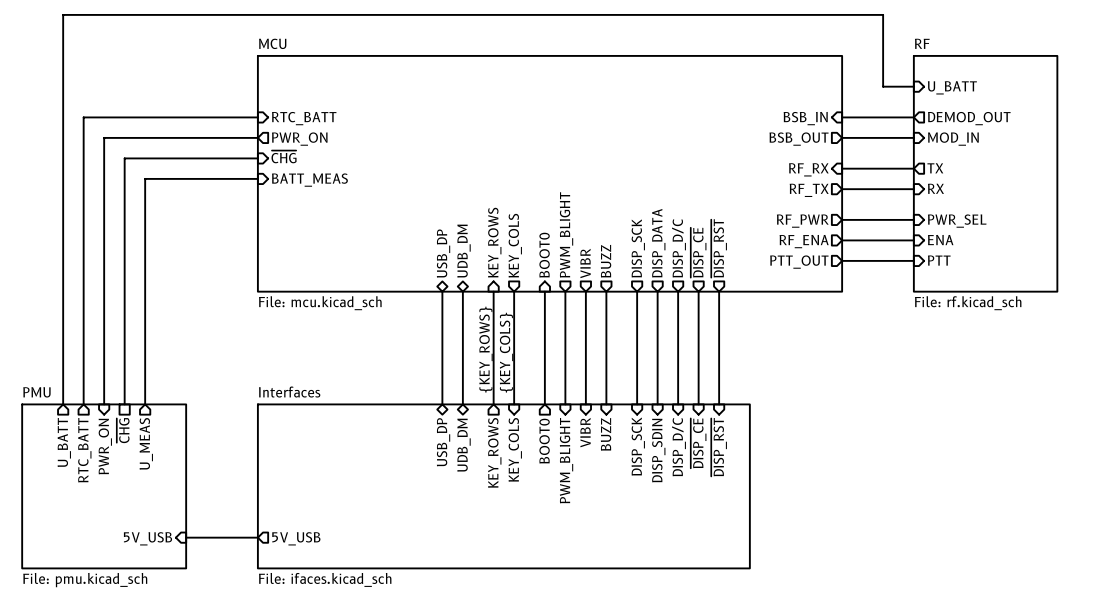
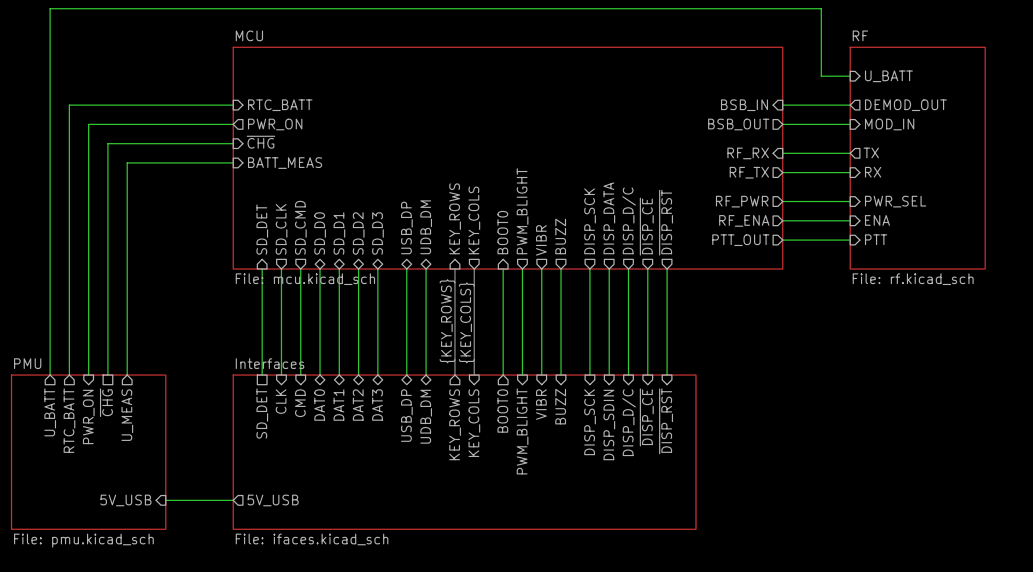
sheet pin: none -> SD_CMD (300, 227)
sheet pin: none -> SD_DET (262, 229)
sheet pin: none -> SD_CLK (281, 229)
sheet pin: none -> SD_D0 (320, 233)
sheet pin: none -> SD_D1 (339, 233)
sheet pin: none -> SD_D2 (358, 233)
sheet pin: none -> SD_D3 (377, 233)
wire: none -> (262, 269) (262, 375)
wire: none -> (281, 269) (281, 375)
wire: none -> (300, 269) (300, 375)
wire: none -> (320, 269) (320, 375)
wire: none -> (339, 269) (339, 375)
wire: none -> (358, 269) (358, 375)
wire: none -> (377, 269) (377, 375)
sheet pin: none -> CLK (281, 401)
sheet pin: none -> CMD (300, 403)
sheet pin: none -> DAT0 (319, 405)
sheet pin: none -> DAT1 (338, 405)
sheet pin: none -> DAT2 (358, 405)
sheet pin: none -> DAT3 (377, 405)
sheet pin: none -> SD_DET (262, 413)

